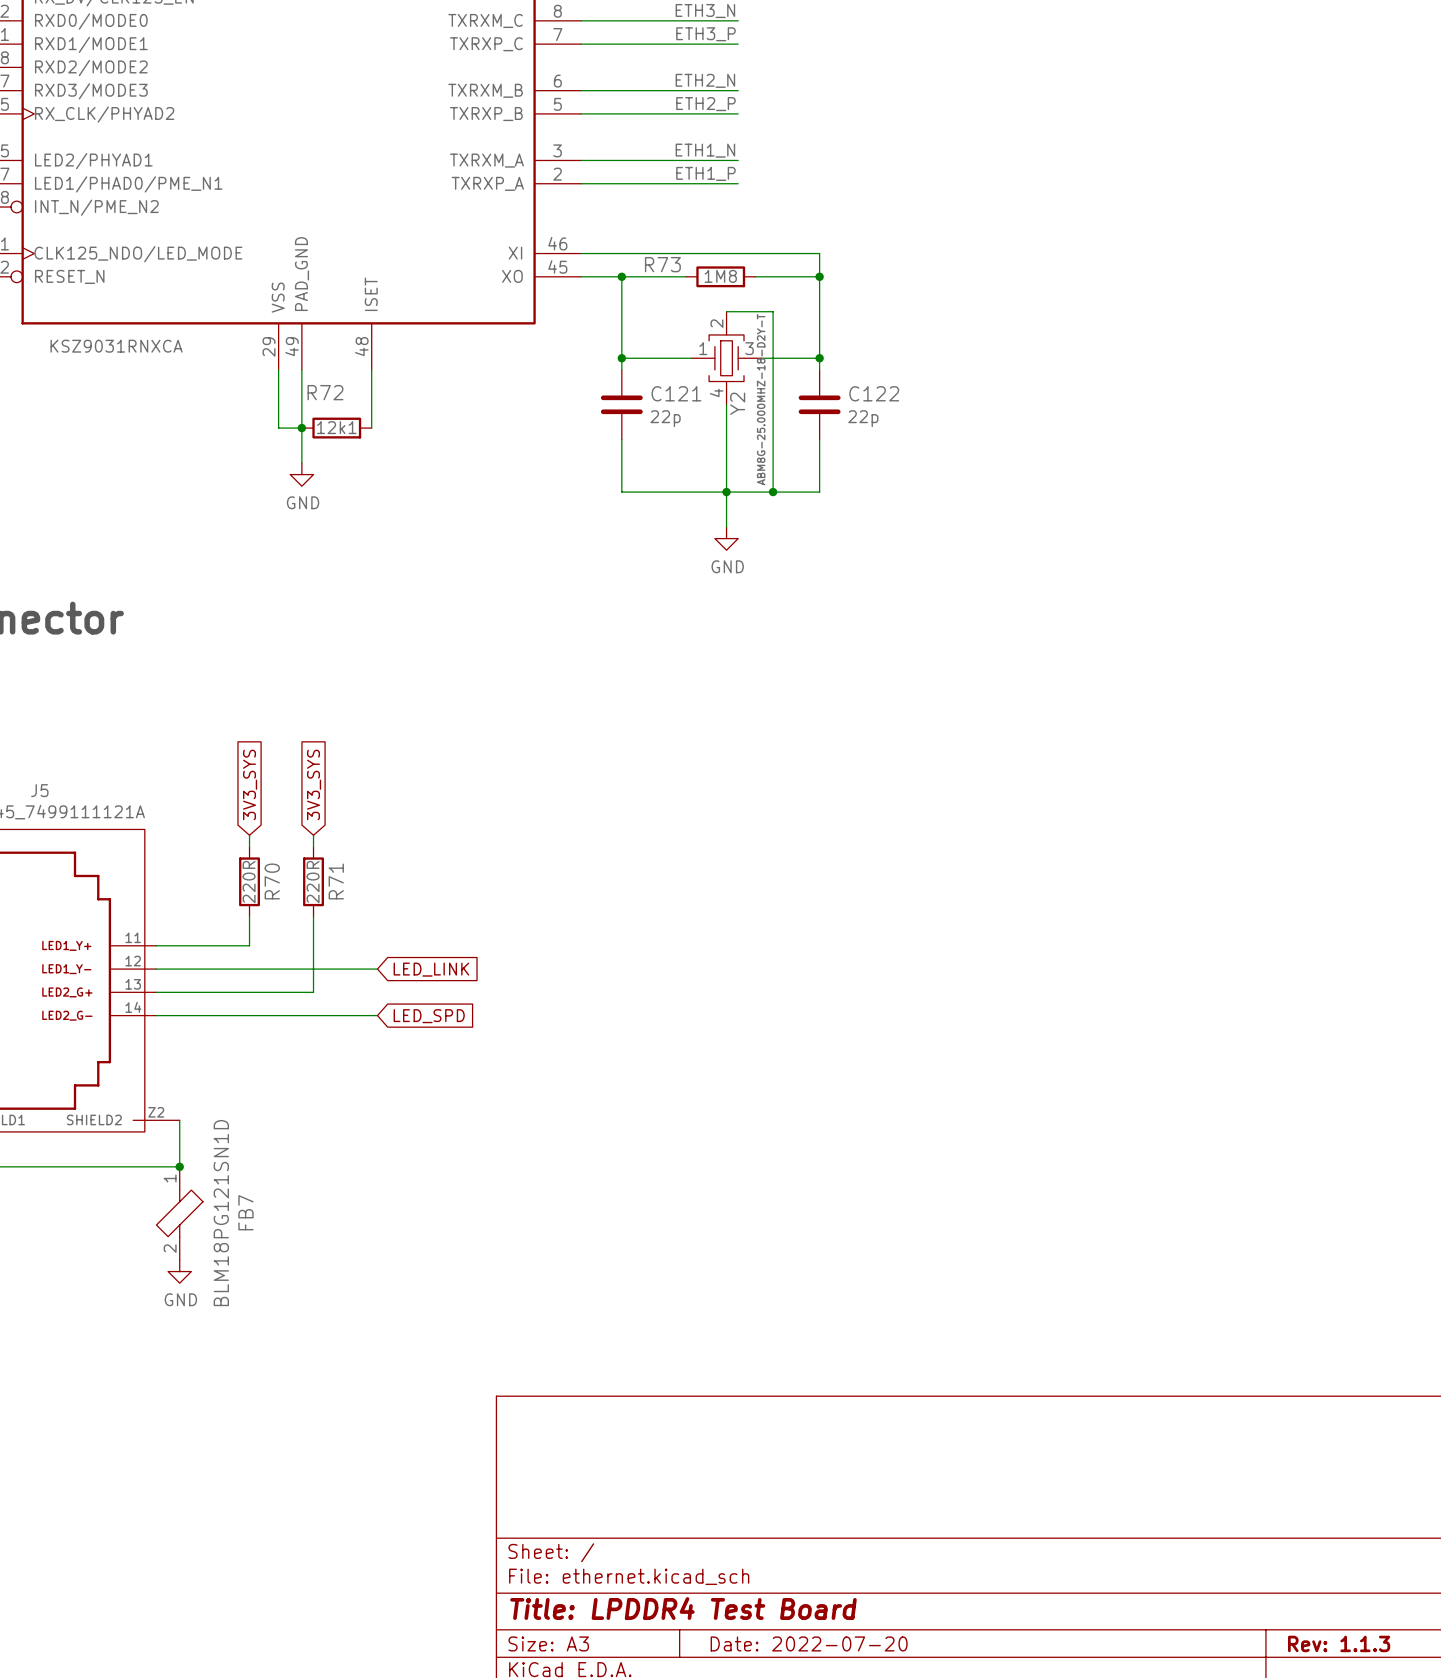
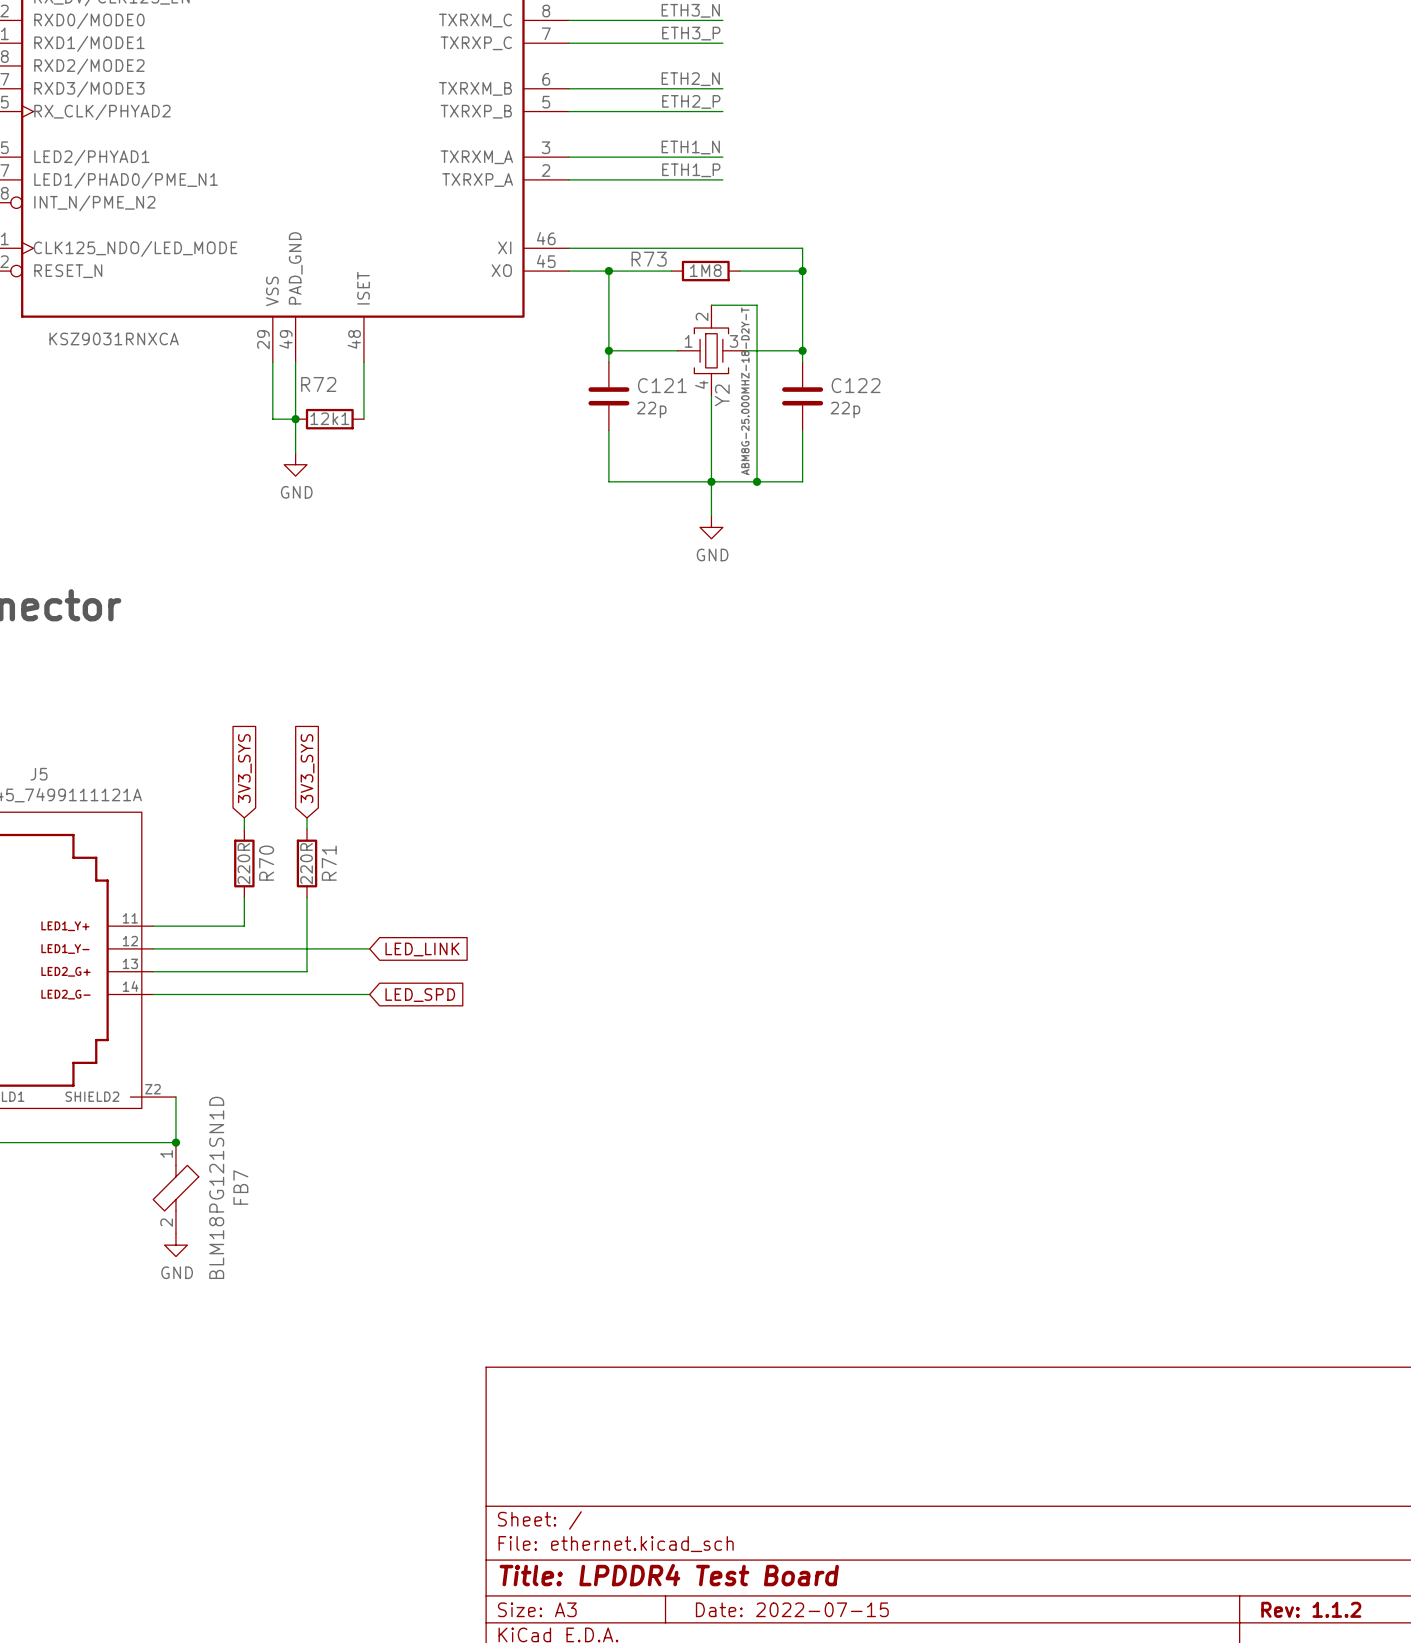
title block: Date: 2022-07-20 (809, 1643) -> Date: 2022-07-15 (792, 1609)
title block: Rev: 1.1.3 (1339, 1643) -> Rev: 1.1.2 (1311, 1609)

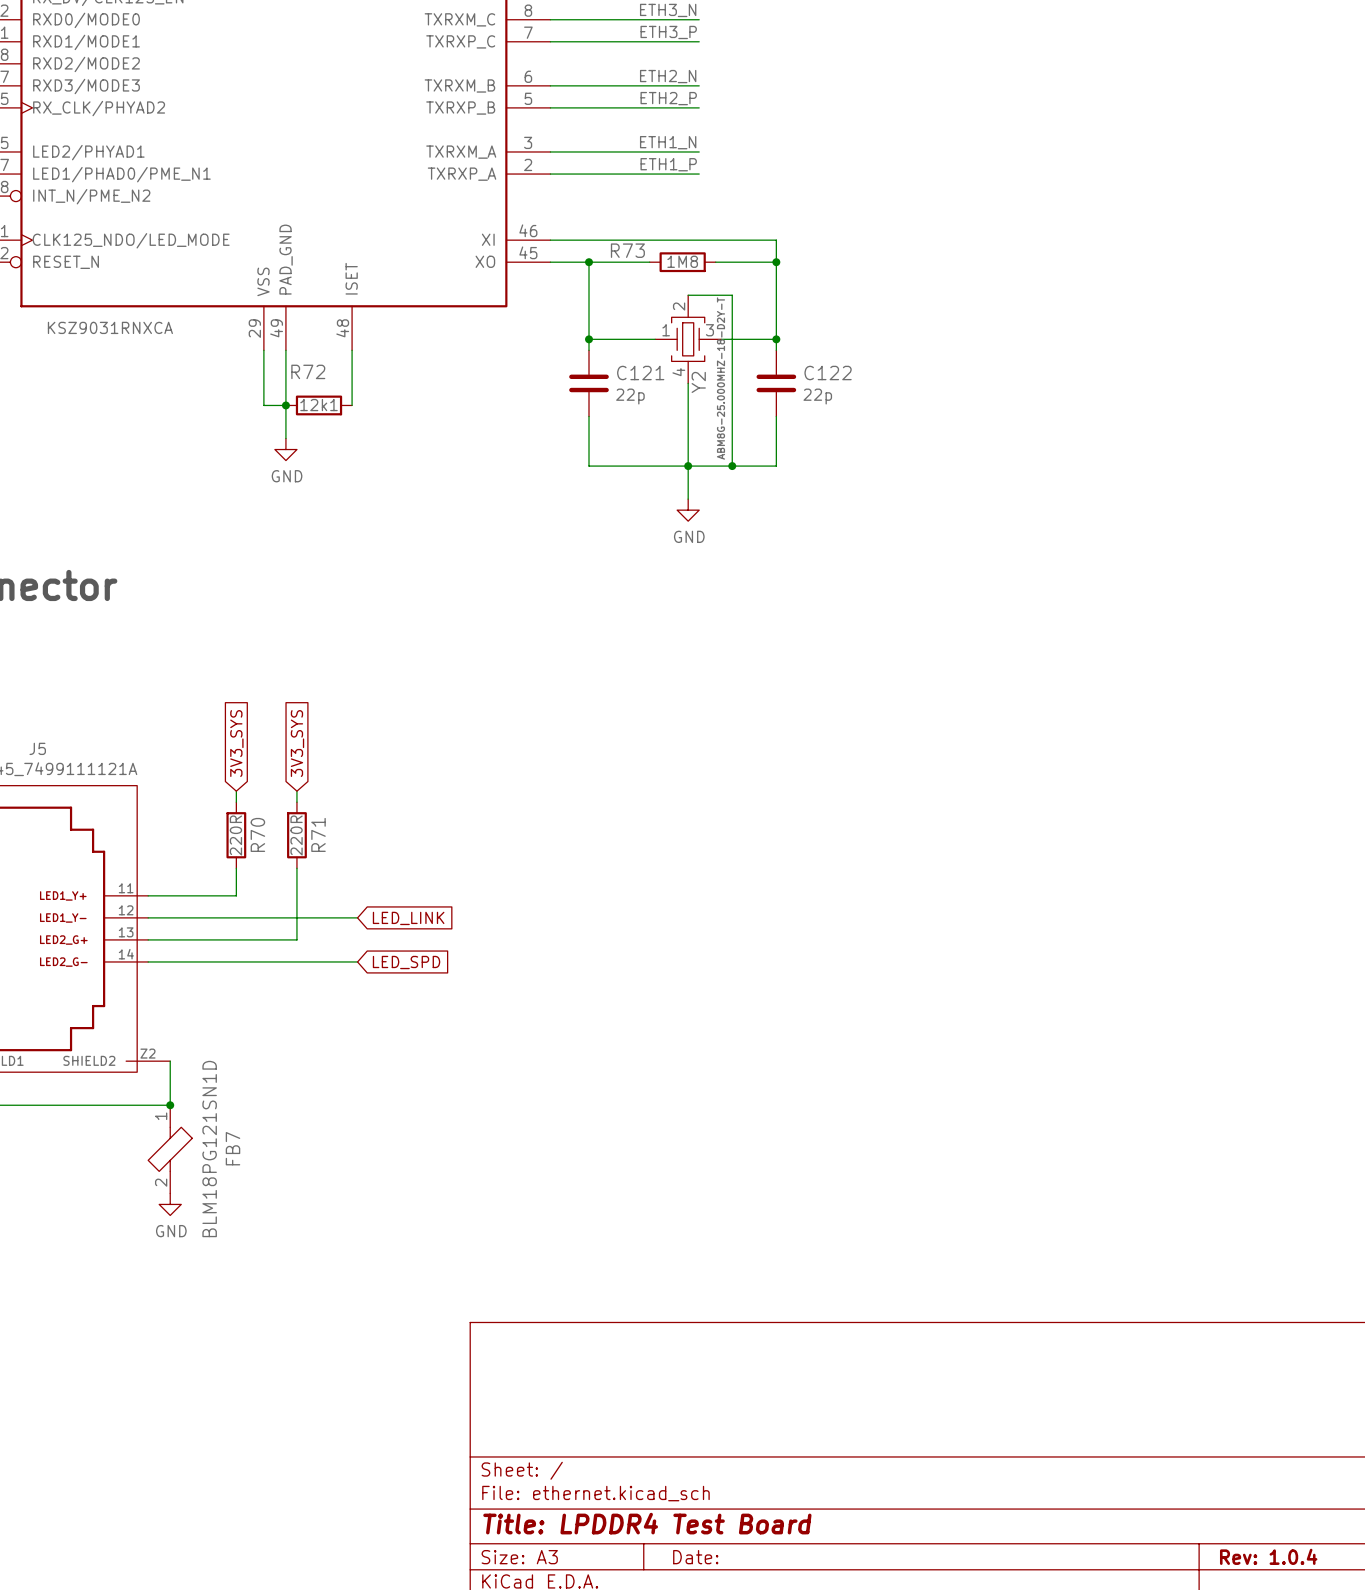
title block: Date: 2022-07-15 (792, 1609) -> Date: (695, 1557)
title block: Rev: 1.1.2 (1311, 1609) -> Rev: 1.0.4 (1268, 1556)

